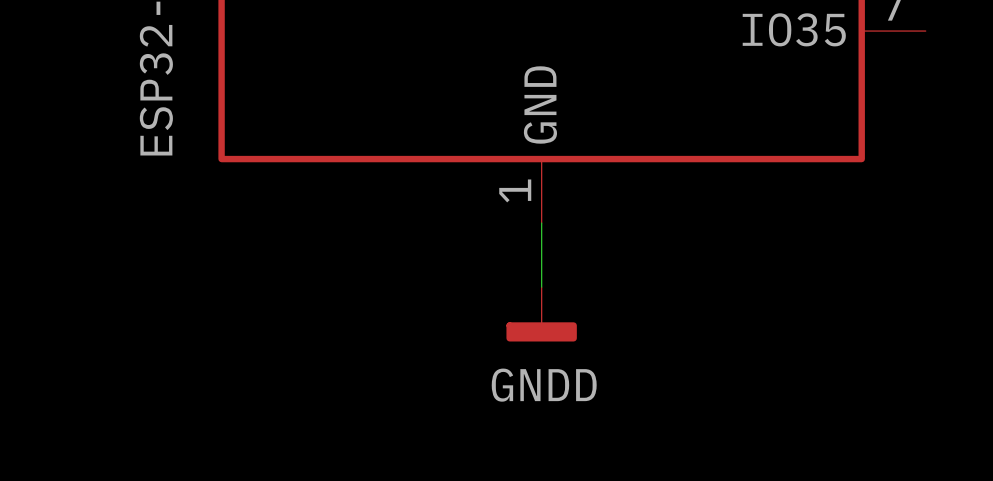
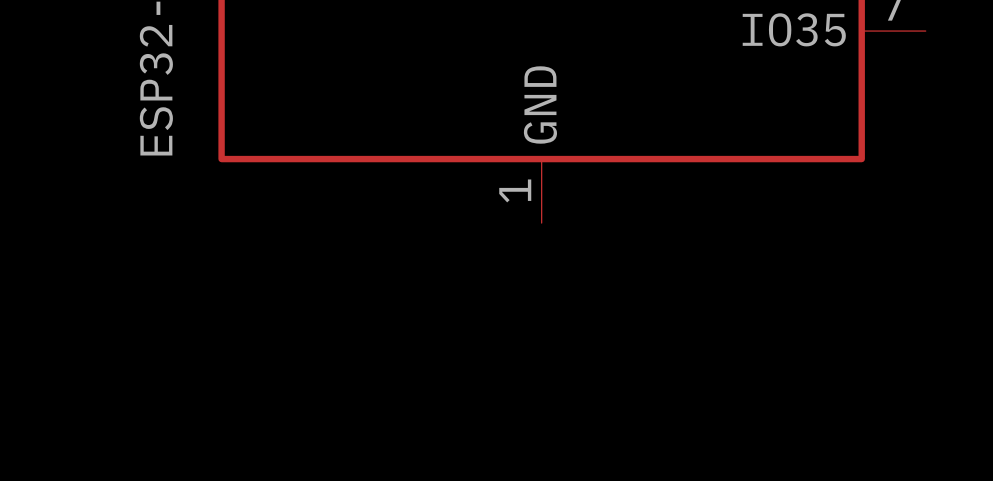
wire: (541, 223) (541, 287) -> none
power symbol: GNDD (541, 314) -> none

